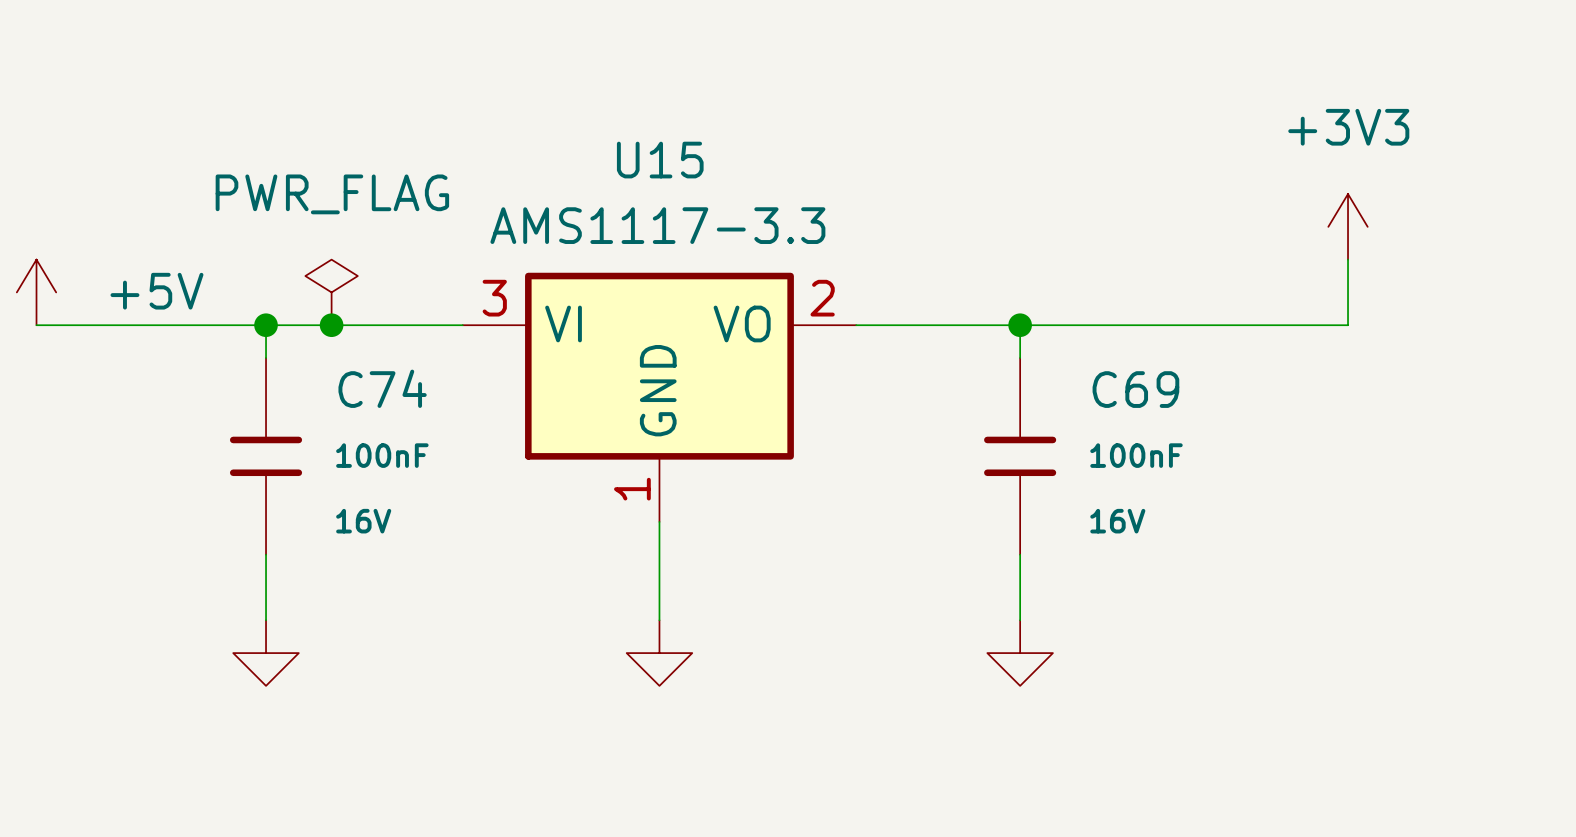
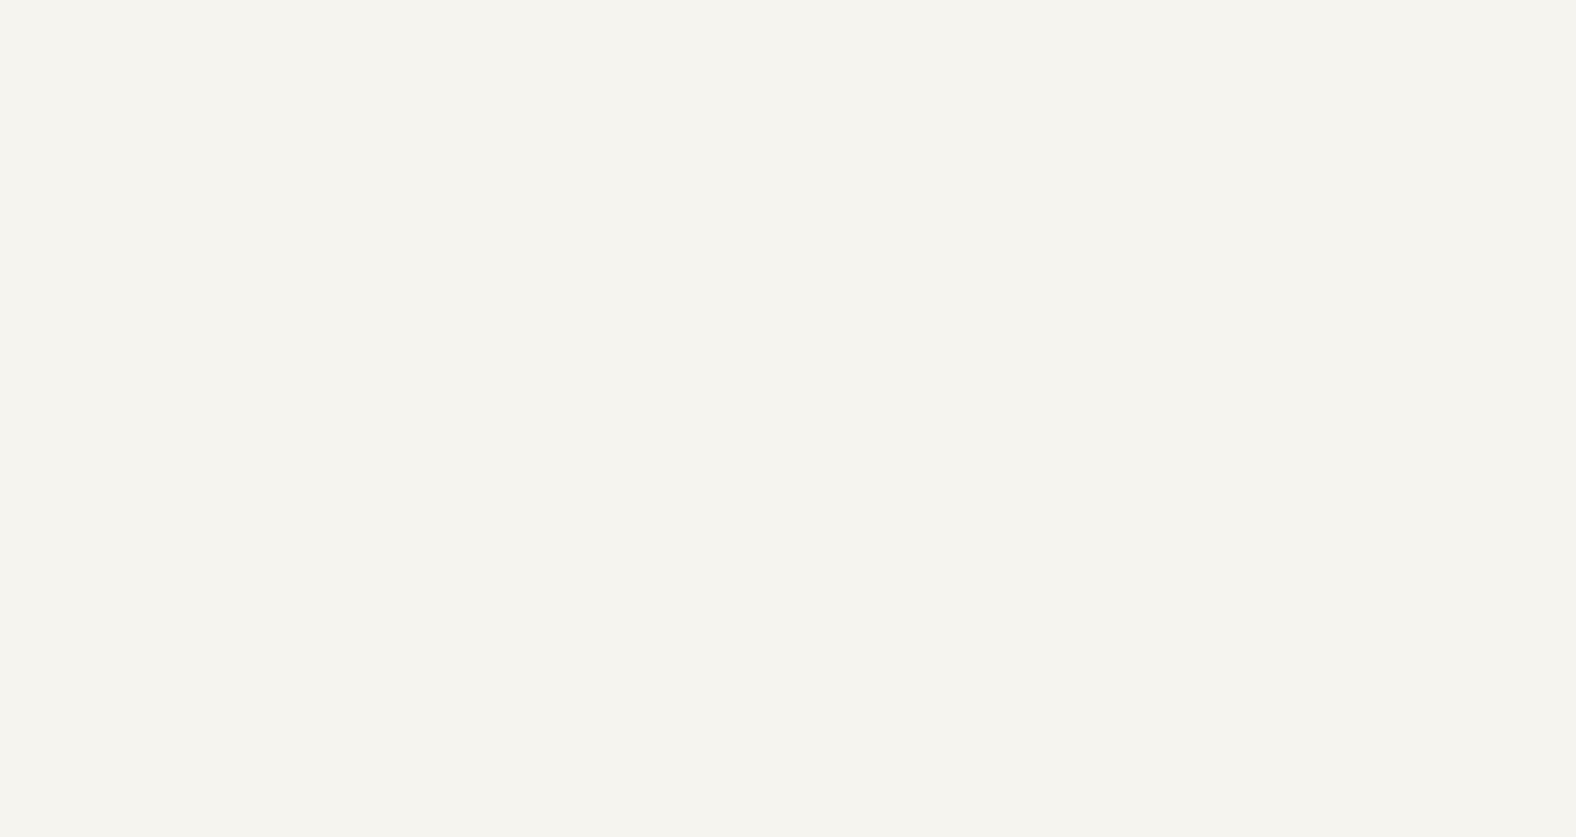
power symbol: +3V3 (1348, 226) -> none
wire: (1348, 259) (1348, 325) (856, 325) -> none
power symbol: +5V (36, 292) -> none
power symbol: PWR_FLAG (331, 292) -> none
wire: (36, 325) (462, 325) -> none
wire: (266, 325) (266, 357) -> none
junction: (266, 325) -> none
junction: (331, 325) -> none
wire: (1020, 325) (1020, 357) -> none
junction: (1020, 325) -> none
U15: AMS1117-3.3 (659, 397) -> none
C74: 100nF (266, 456) -> none
C69: 100nF (1020, 456) -> none
wire: (659, 521) (659, 620) -> none
wire: (266, 554) (266, 620) -> none
wire: (1020, 554) (1020, 620) -> none
power symbol: (266, 653) -> none
power symbol: (659, 653) -> none
power symbol: (1020, 653) -> none

